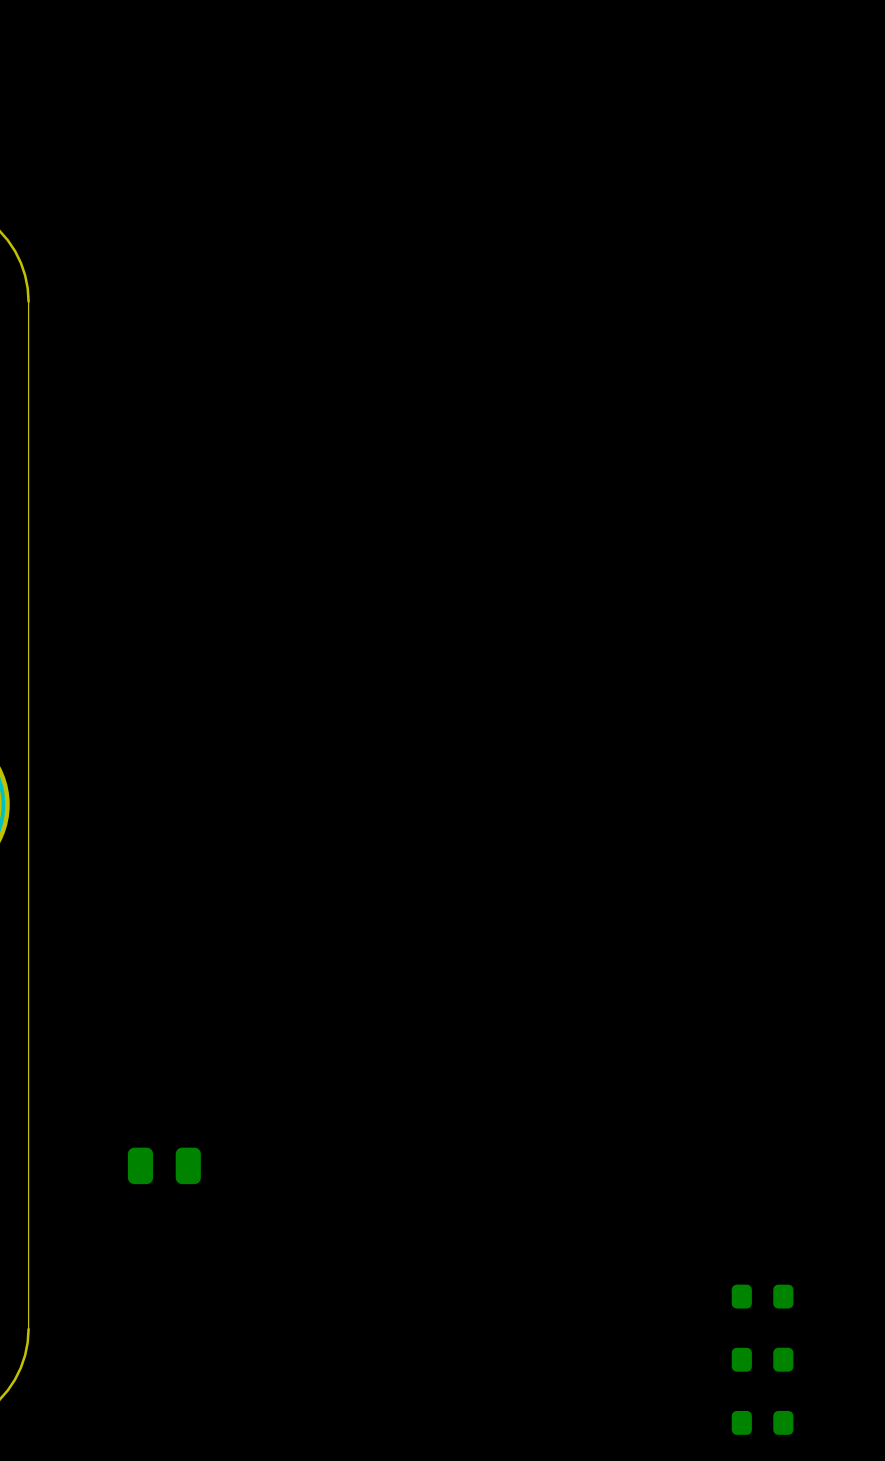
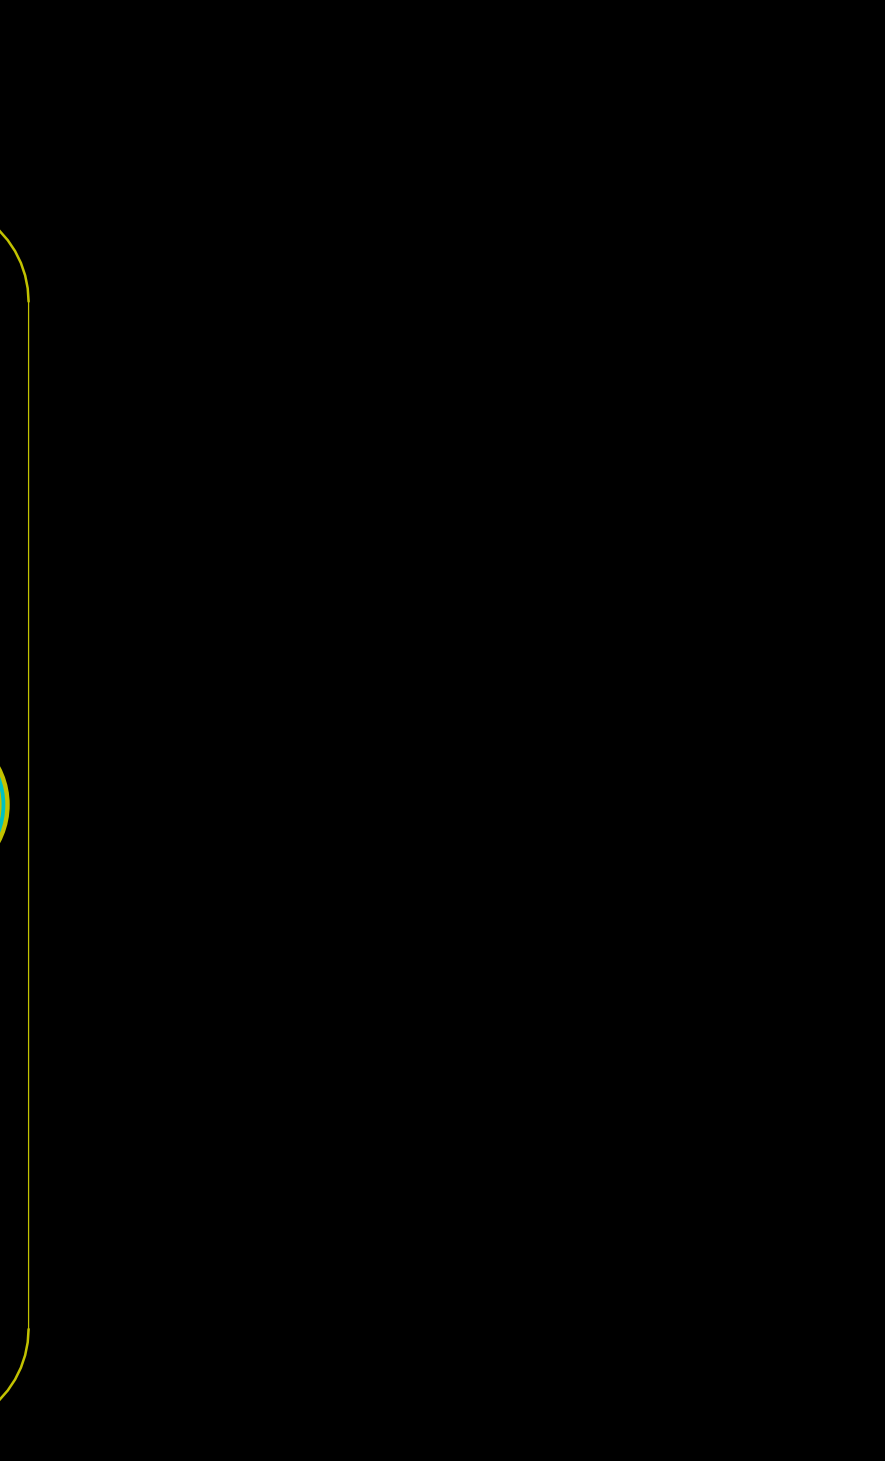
part: (164, 1165) -> none
part: (762, 1296) -> none
part: (762, 1359) -> none
part: (762, 1422) -> none

